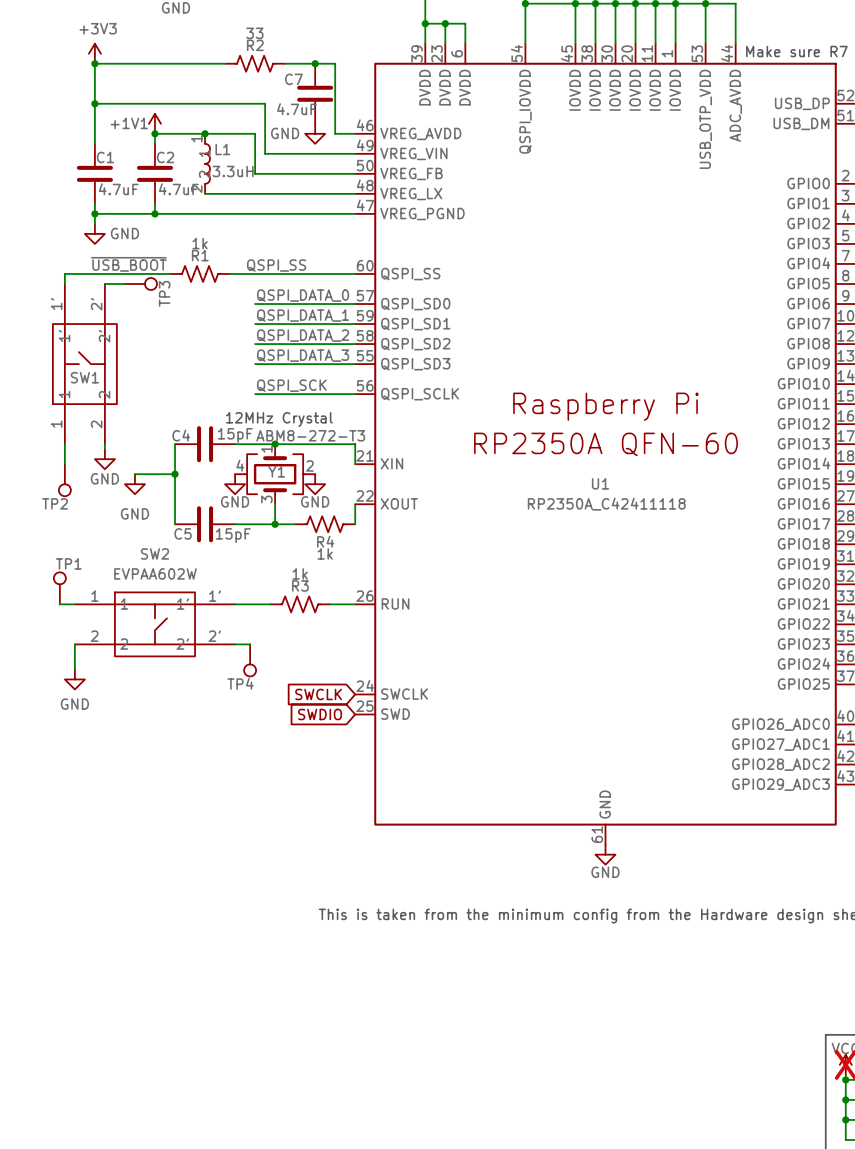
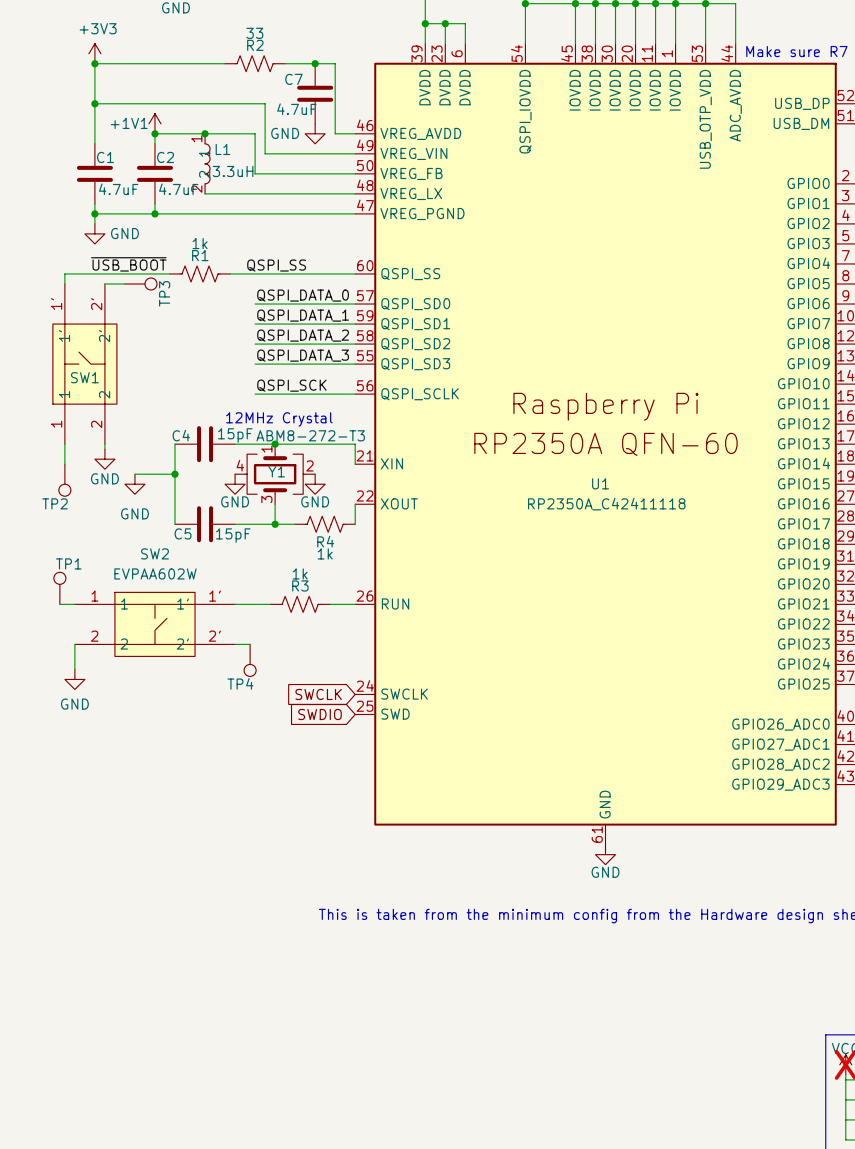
junction: (845, 1079) -> none
junction: (845, 1099) -> none
junction: (845, 1119) -> none

